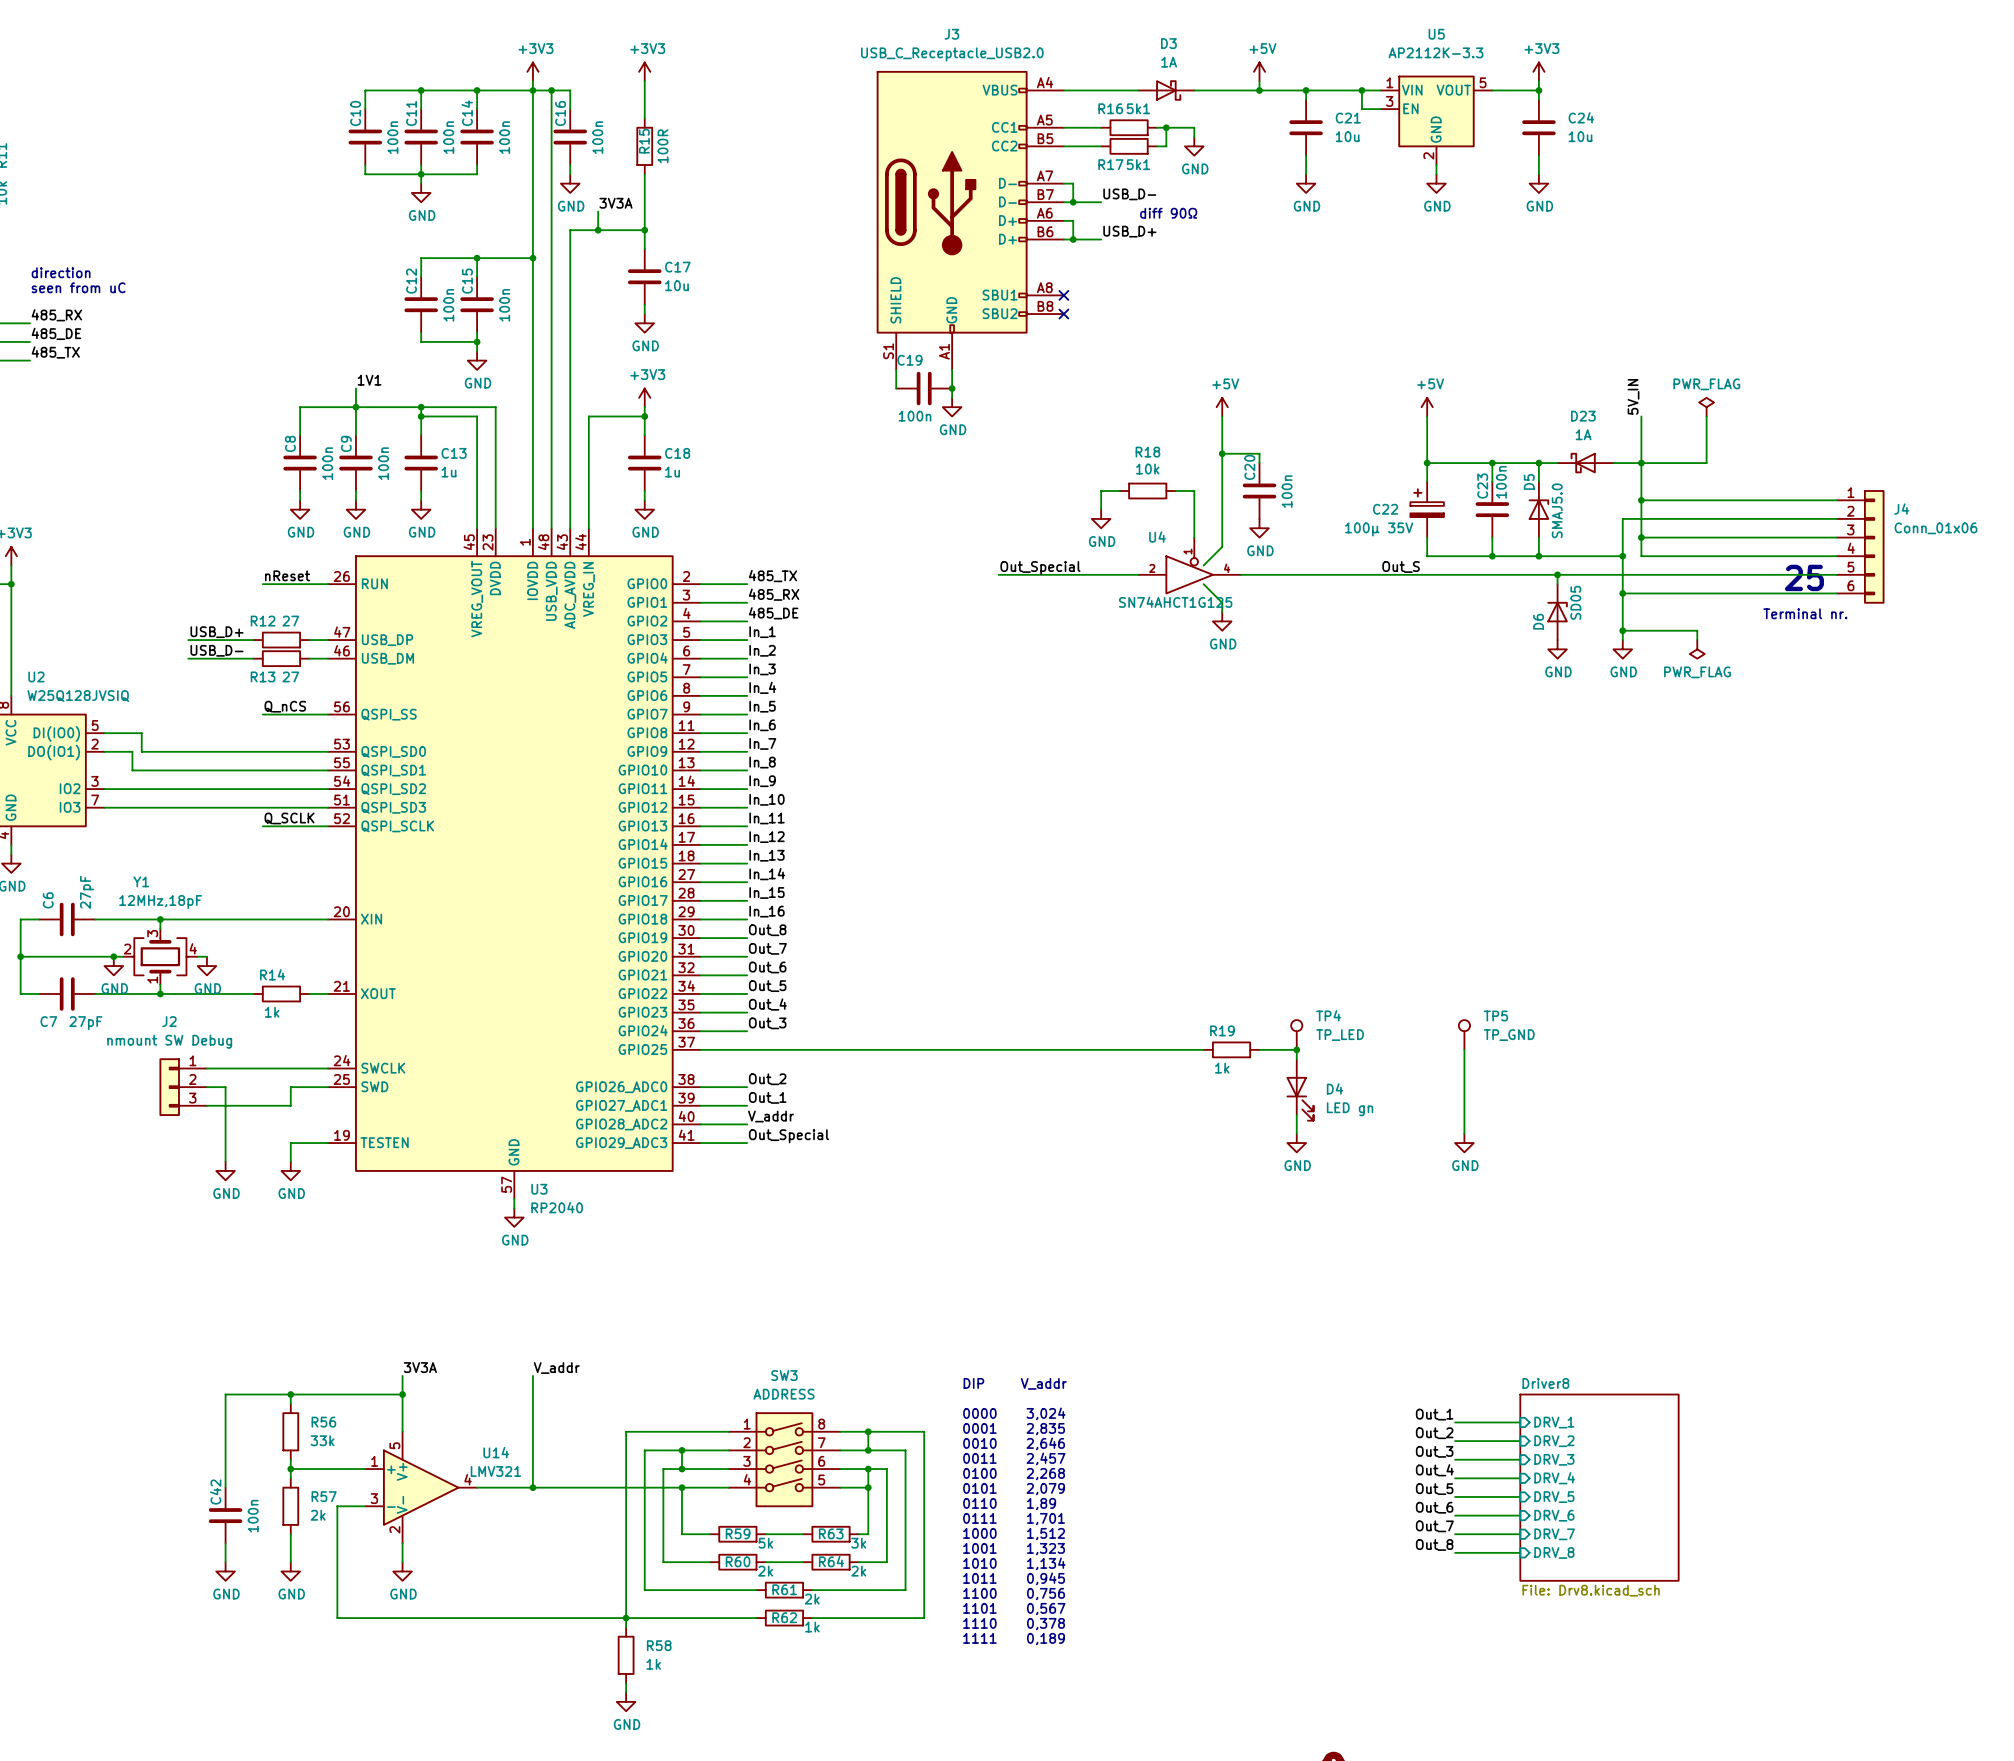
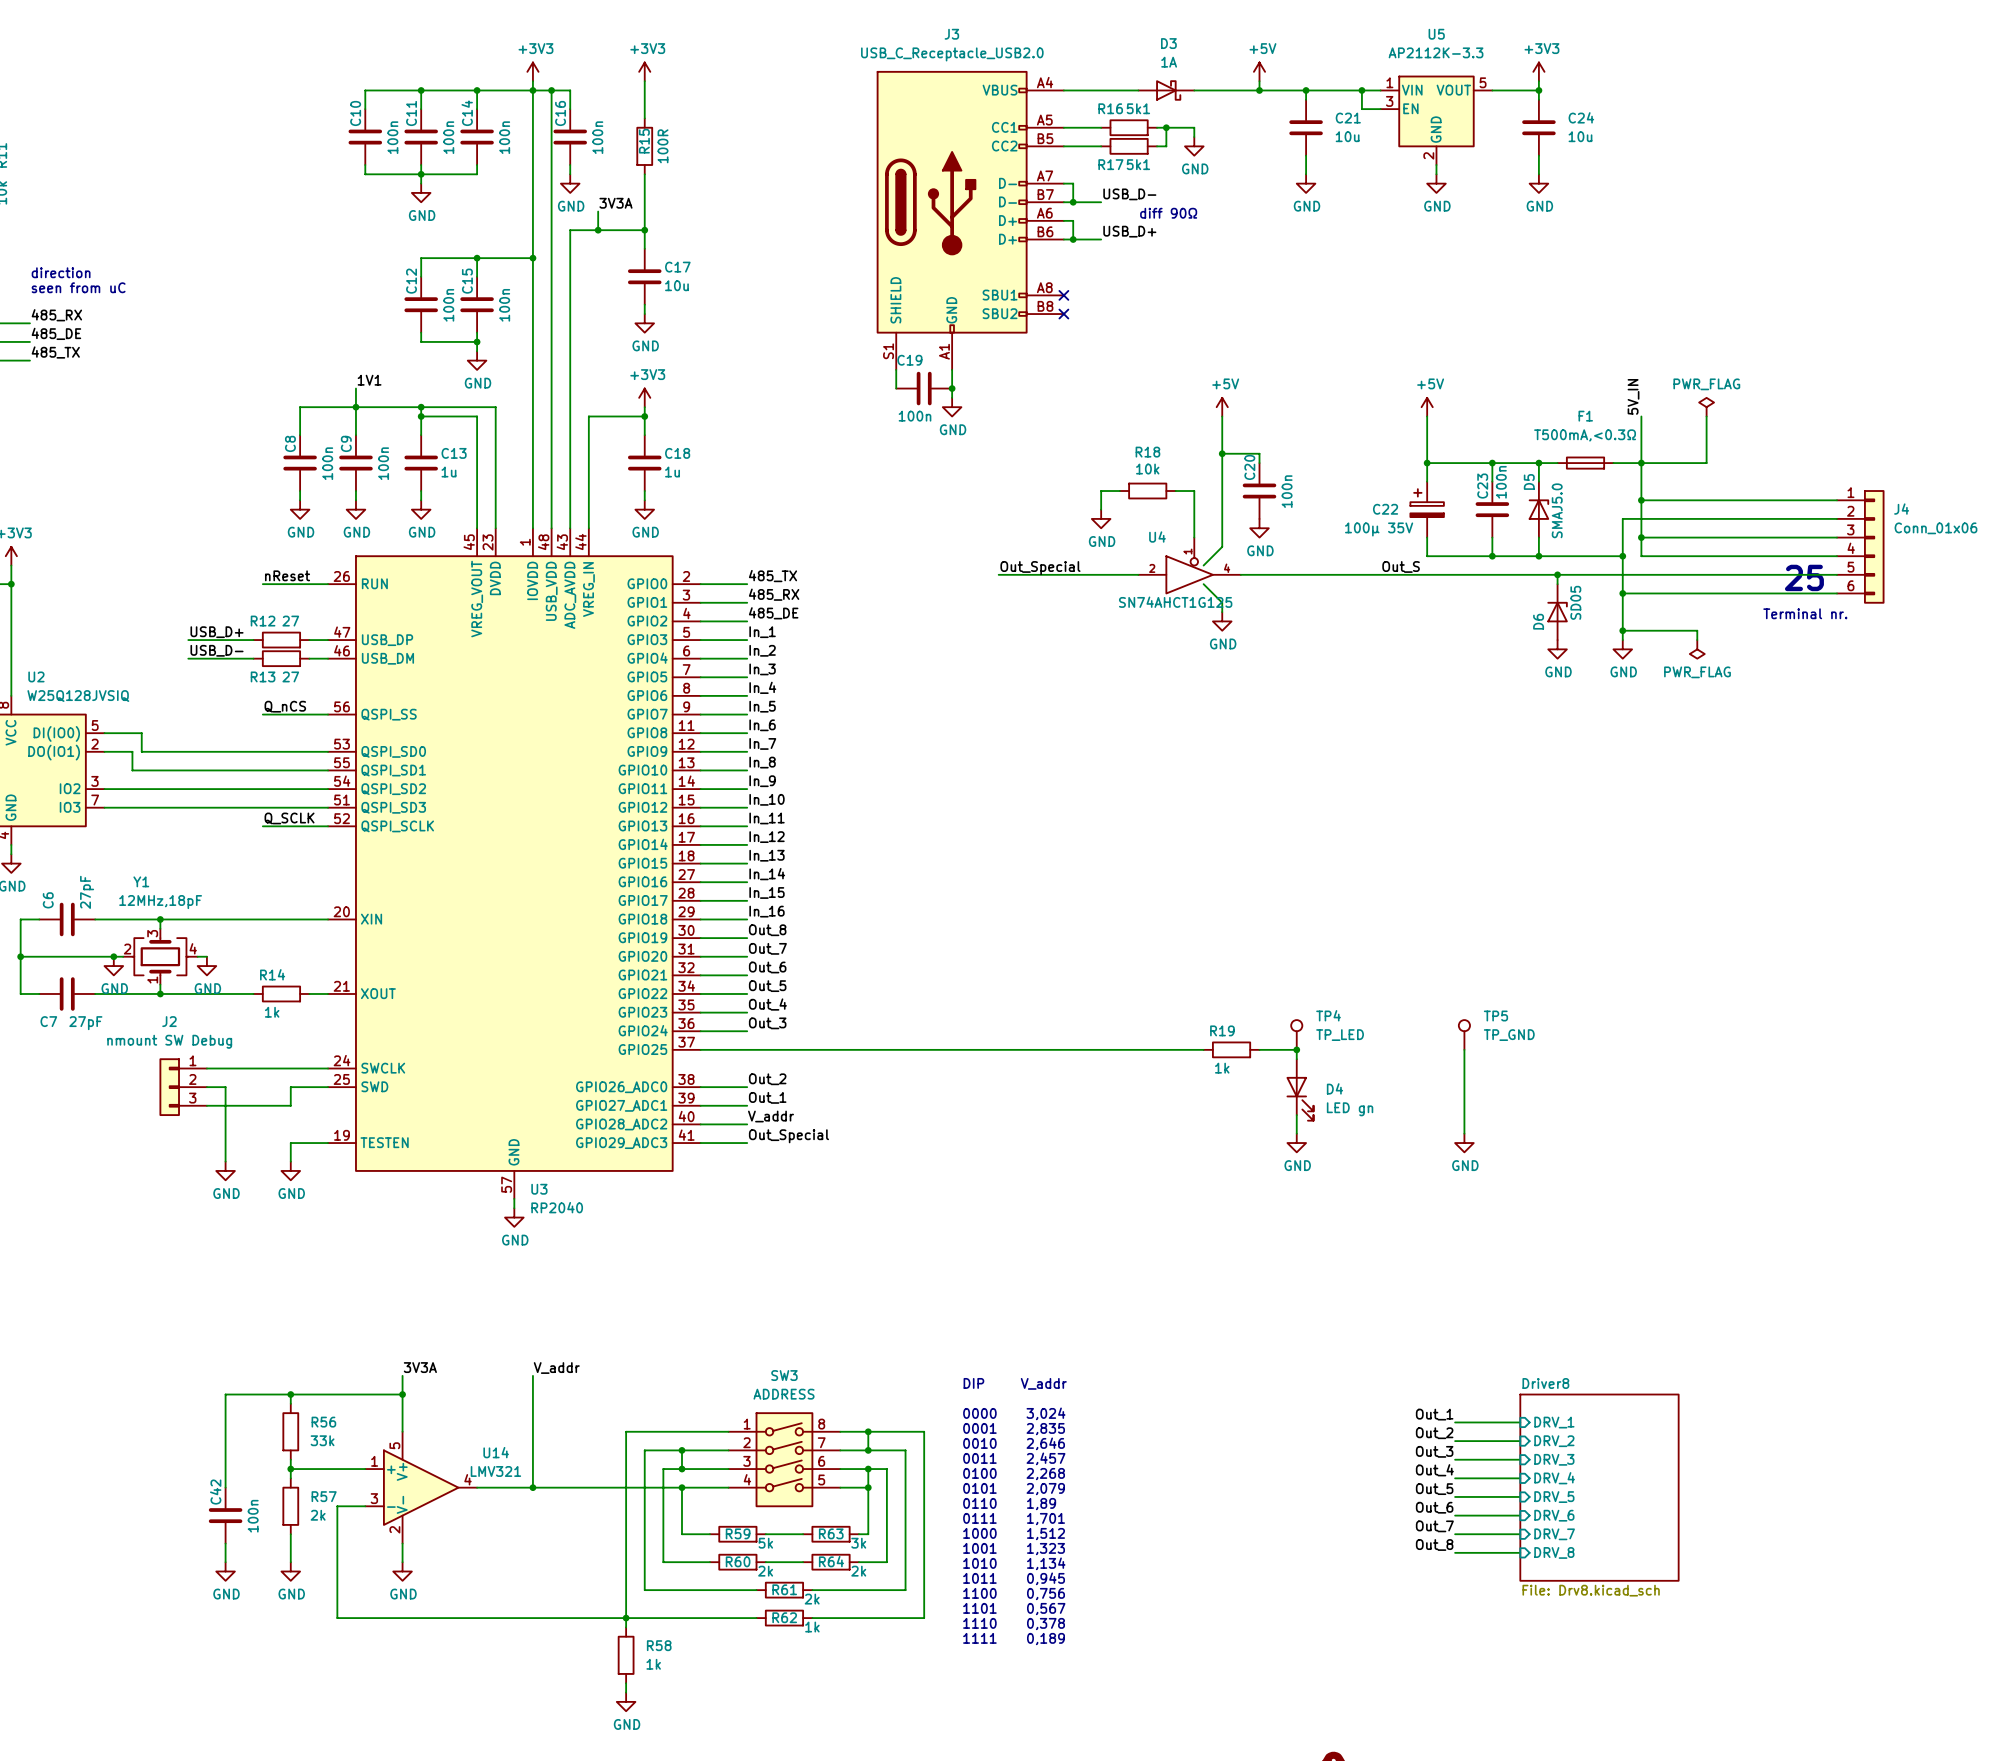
D23: 1A (1585, 463) -> none
F1: none -> T500mA,<0.3Ω (1585, 463)

